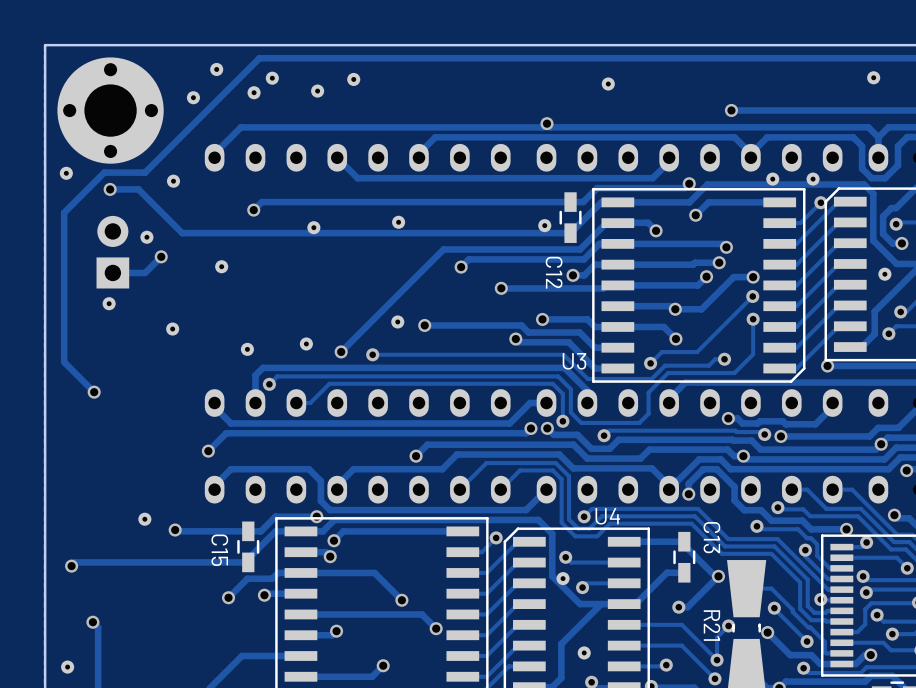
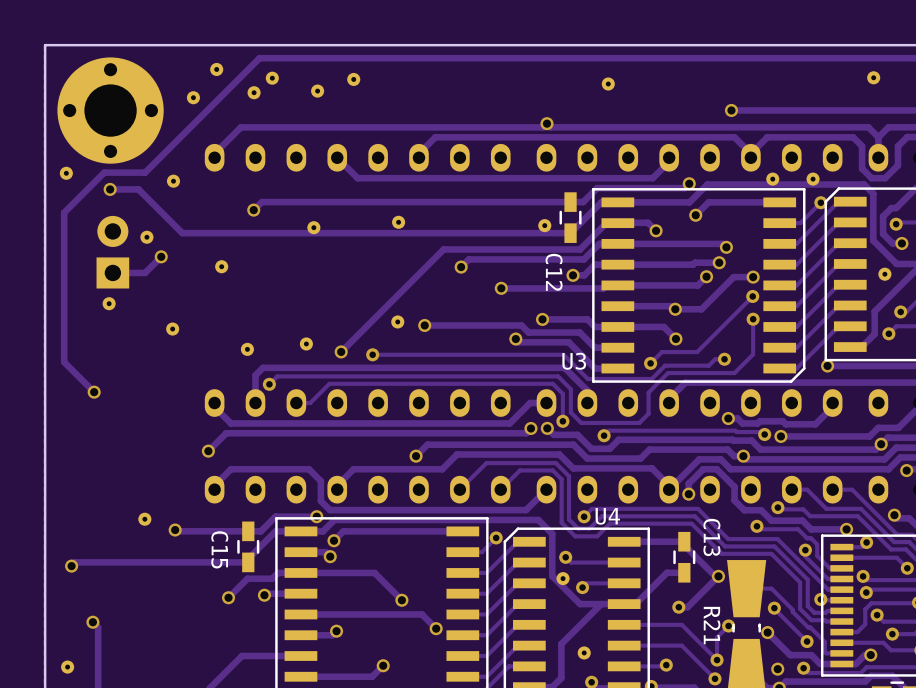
via: none -> (777, 669)

